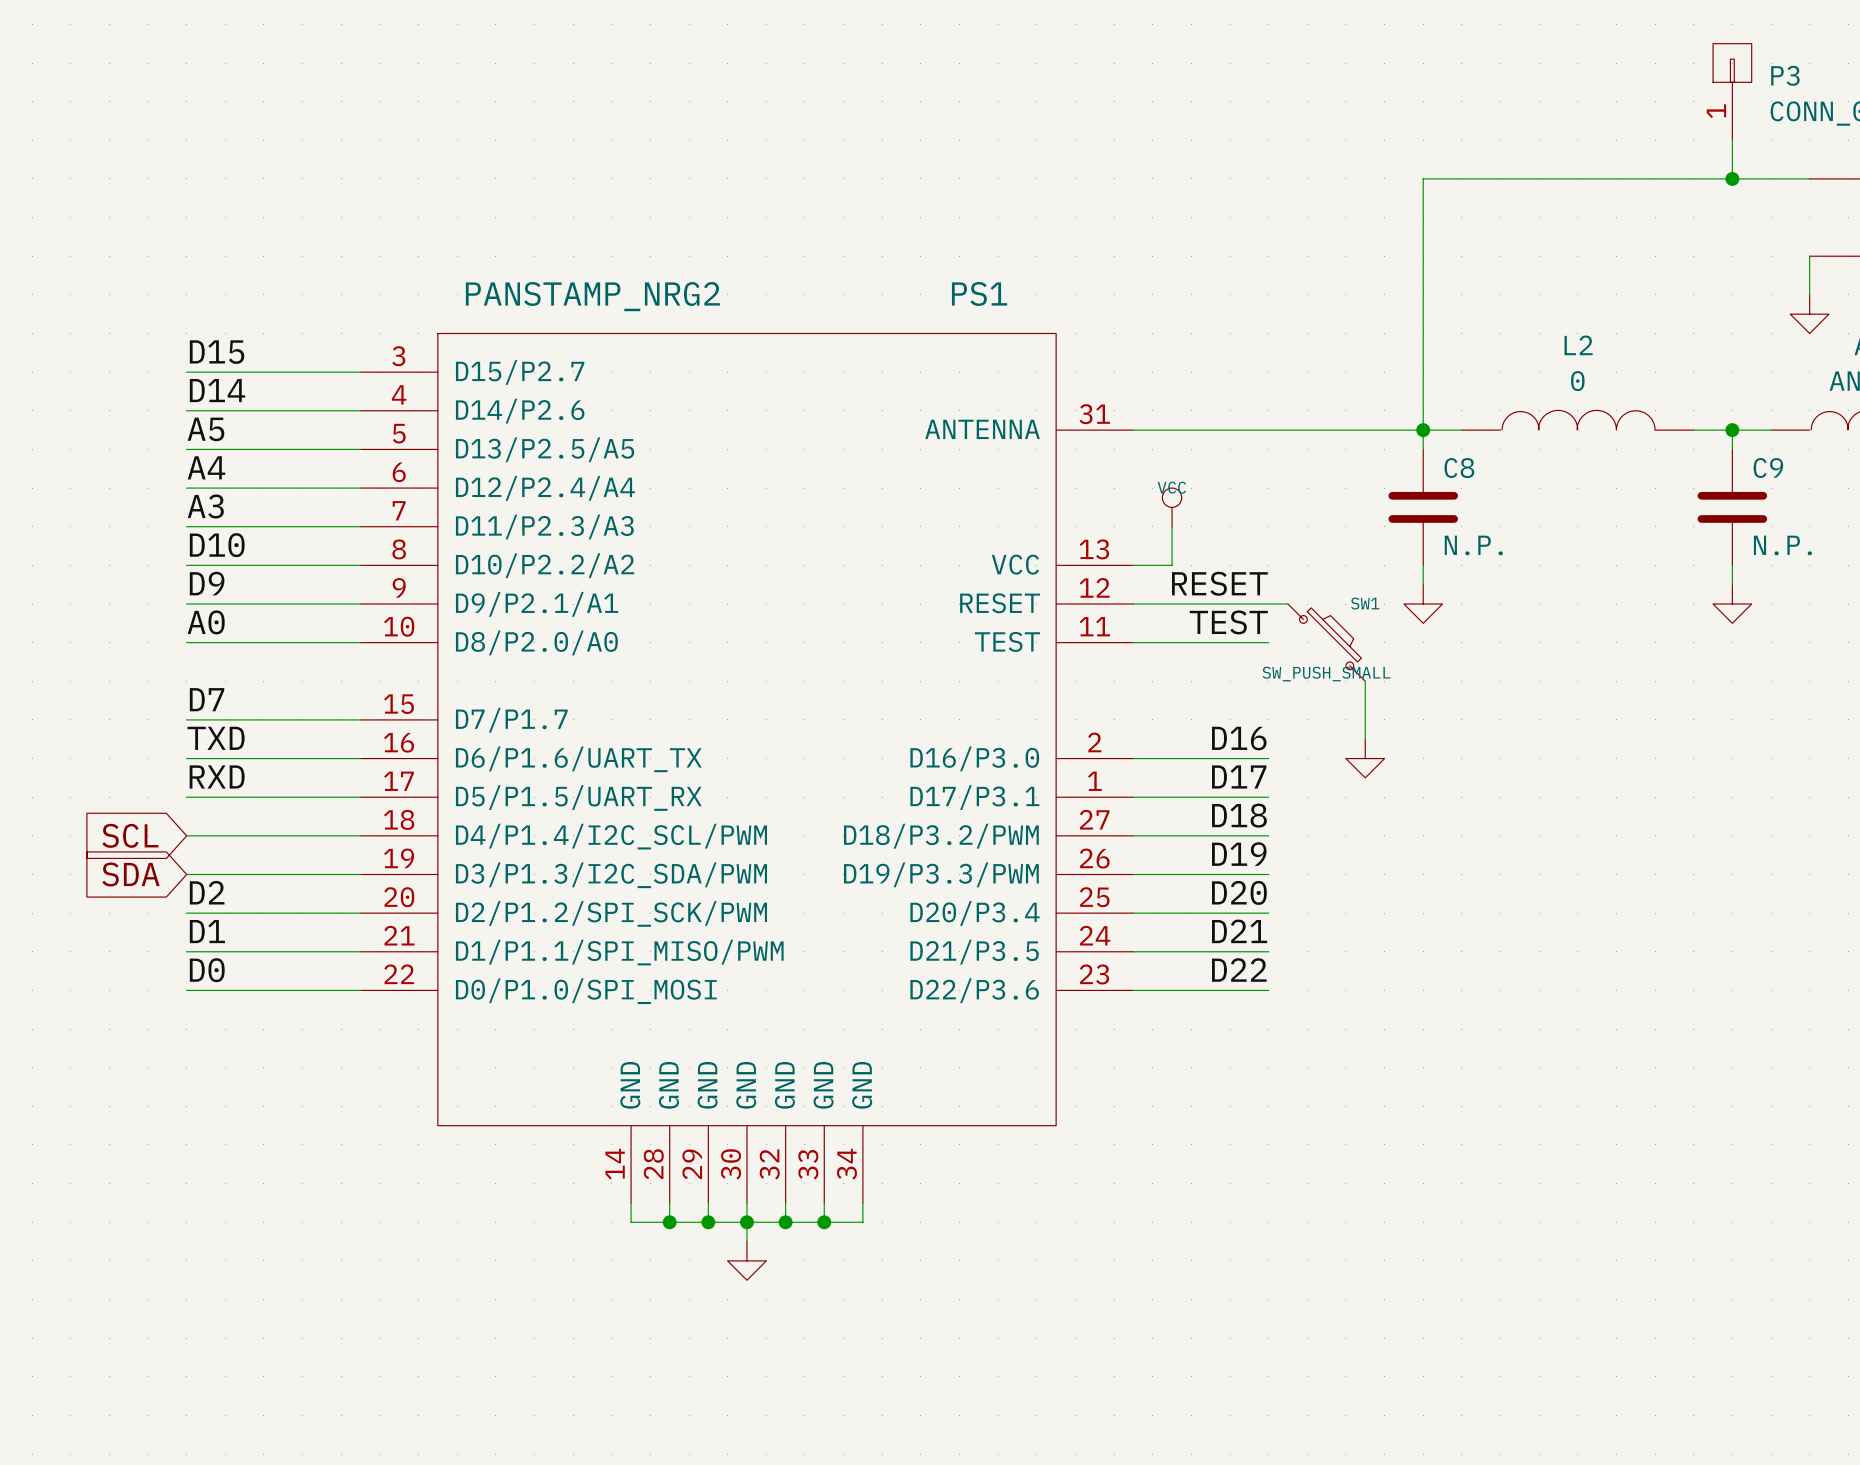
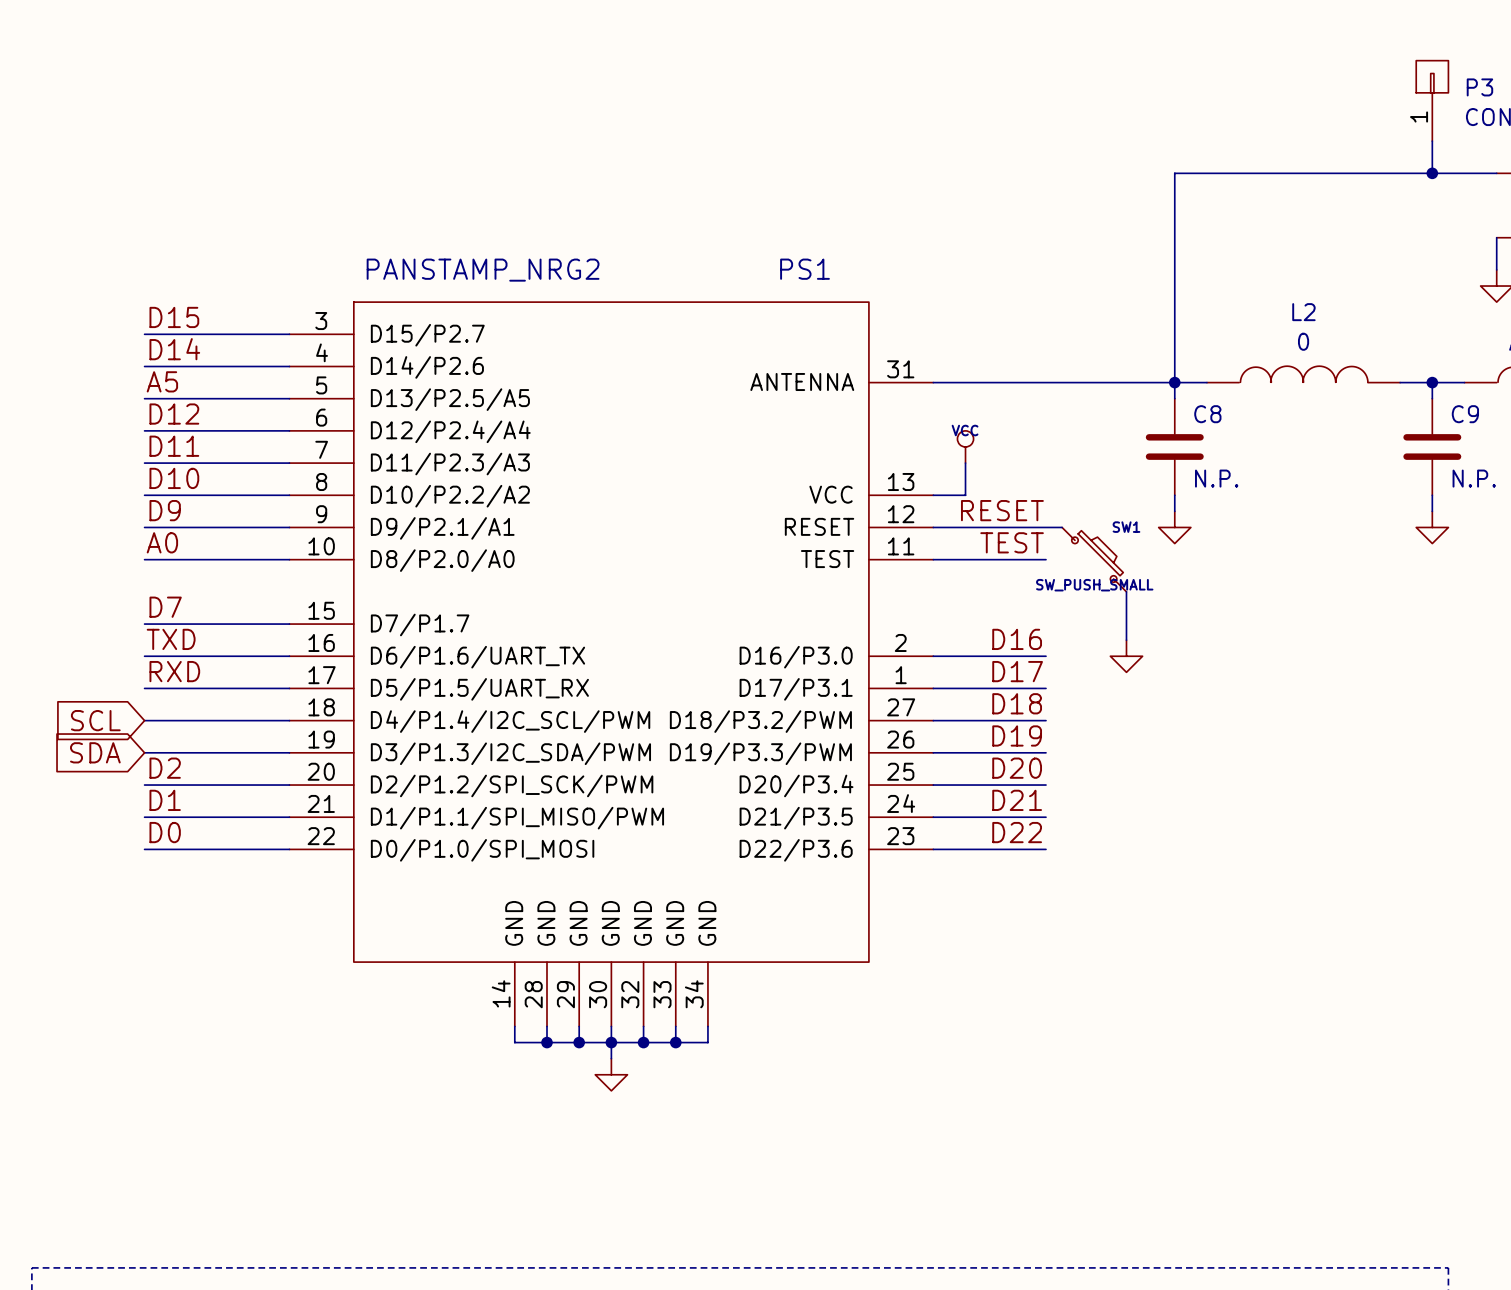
label: A4 (206, 467) -> D12 (174, 414)
label: A3 (205, 506) -> D11 (174, 446)

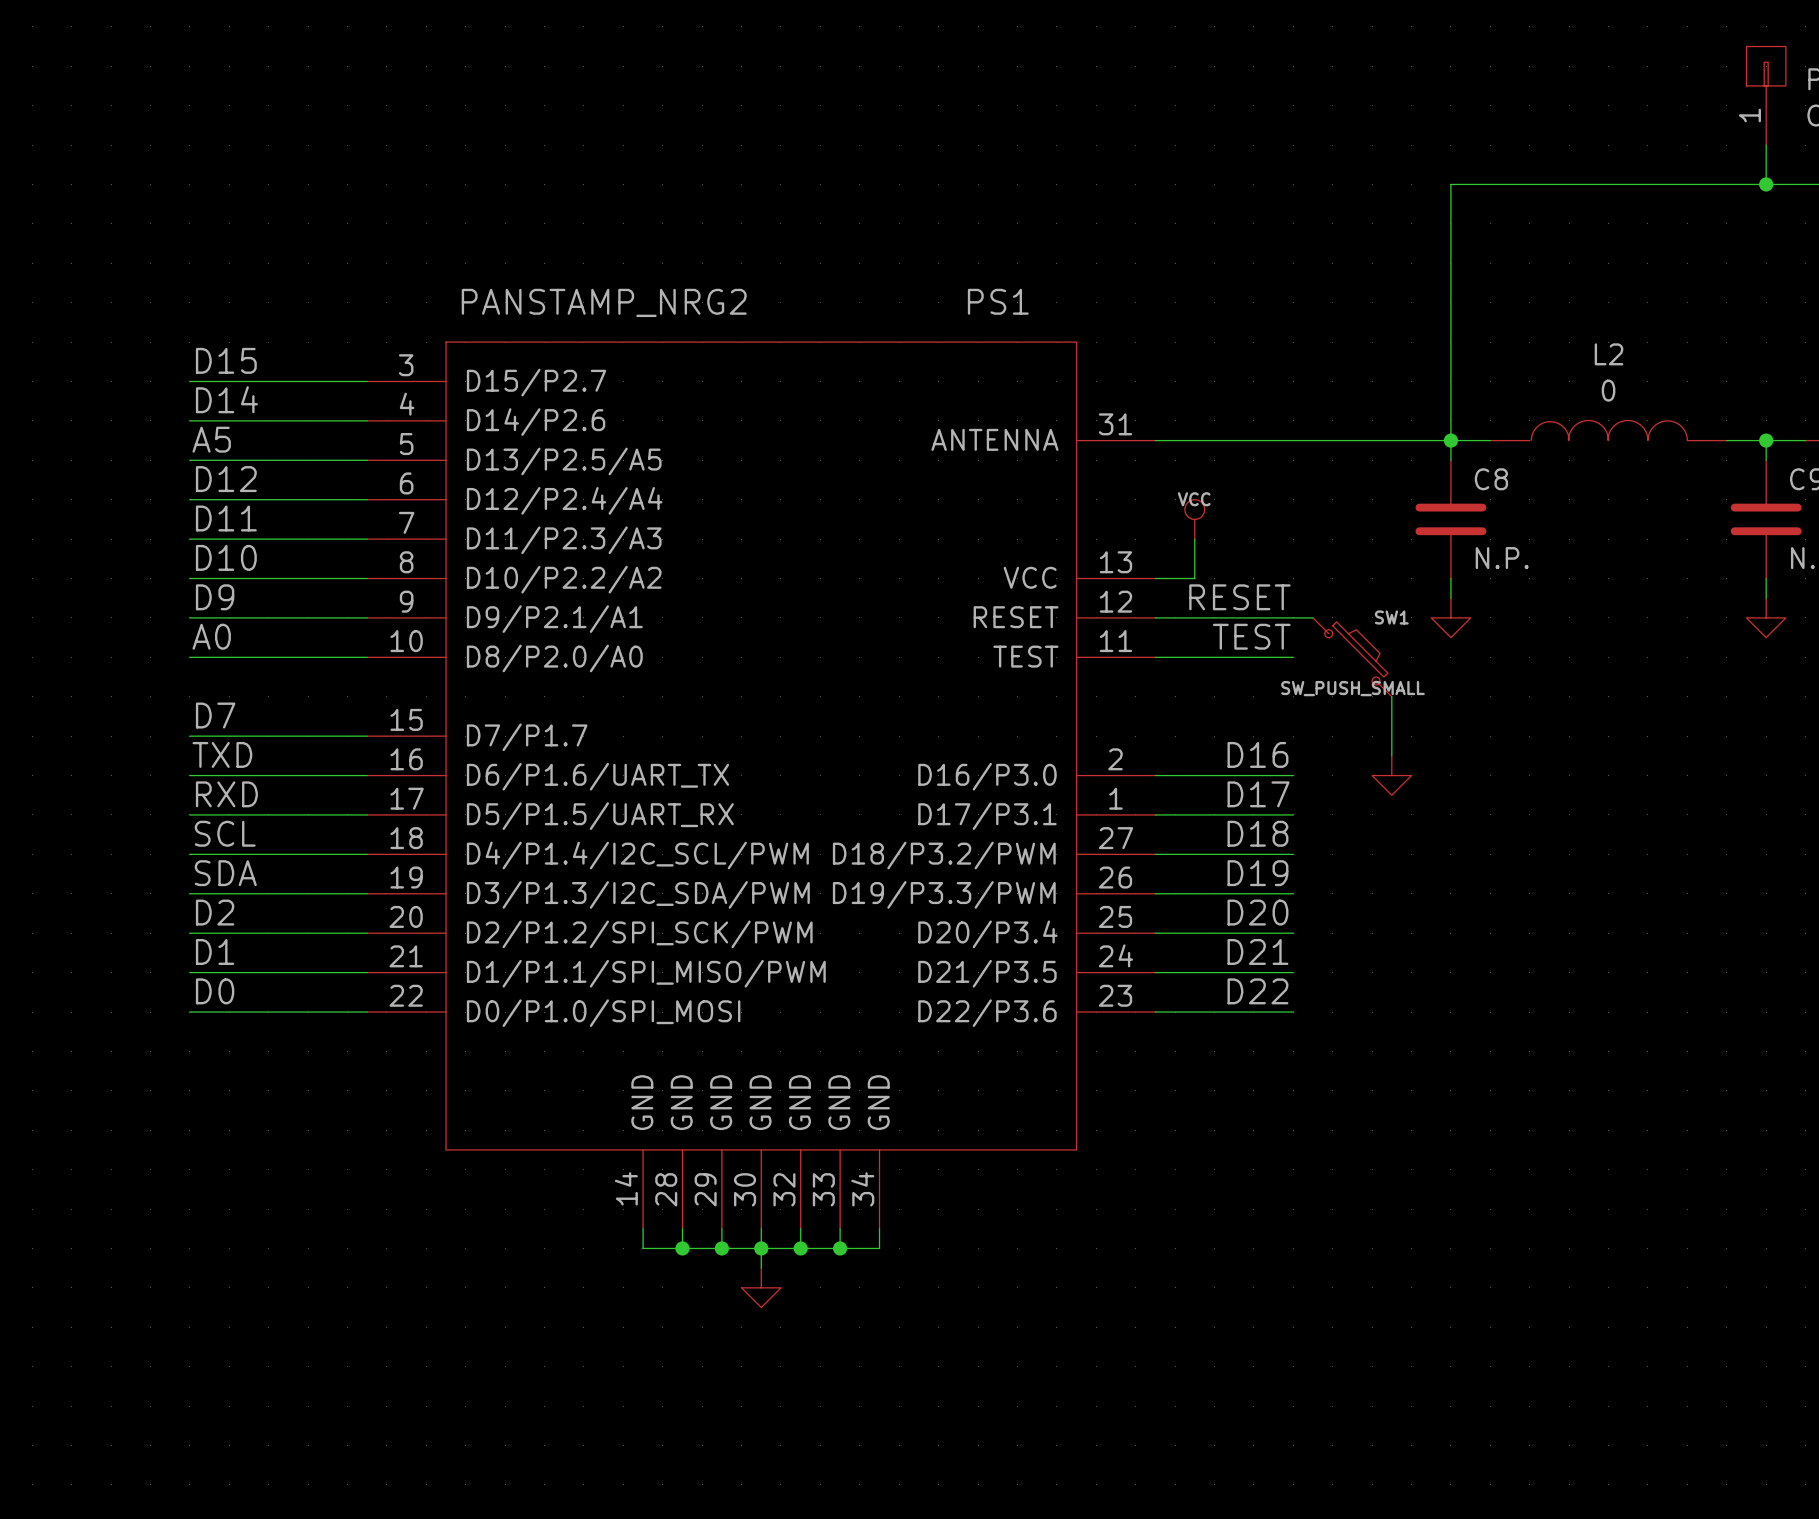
label: none -> SCL (225, 833)
global label: SCL (95, 720) -> none
label: none -> SDA (225, 873)
global label: SDA (95, 752) -> none

